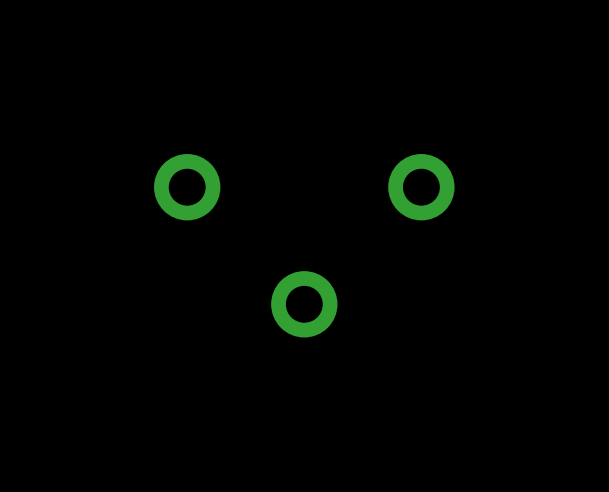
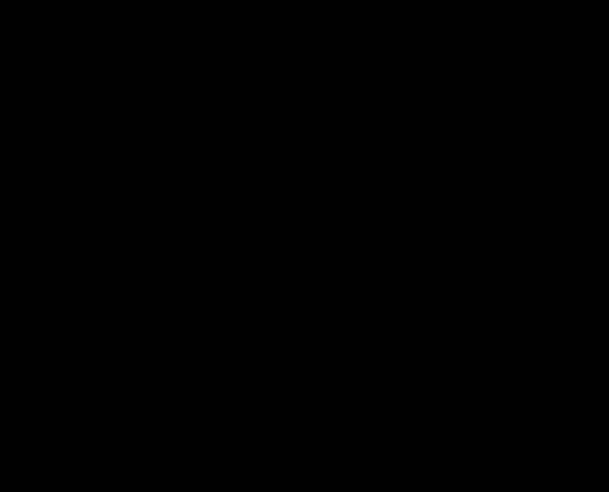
part: (304, 245) -> none

